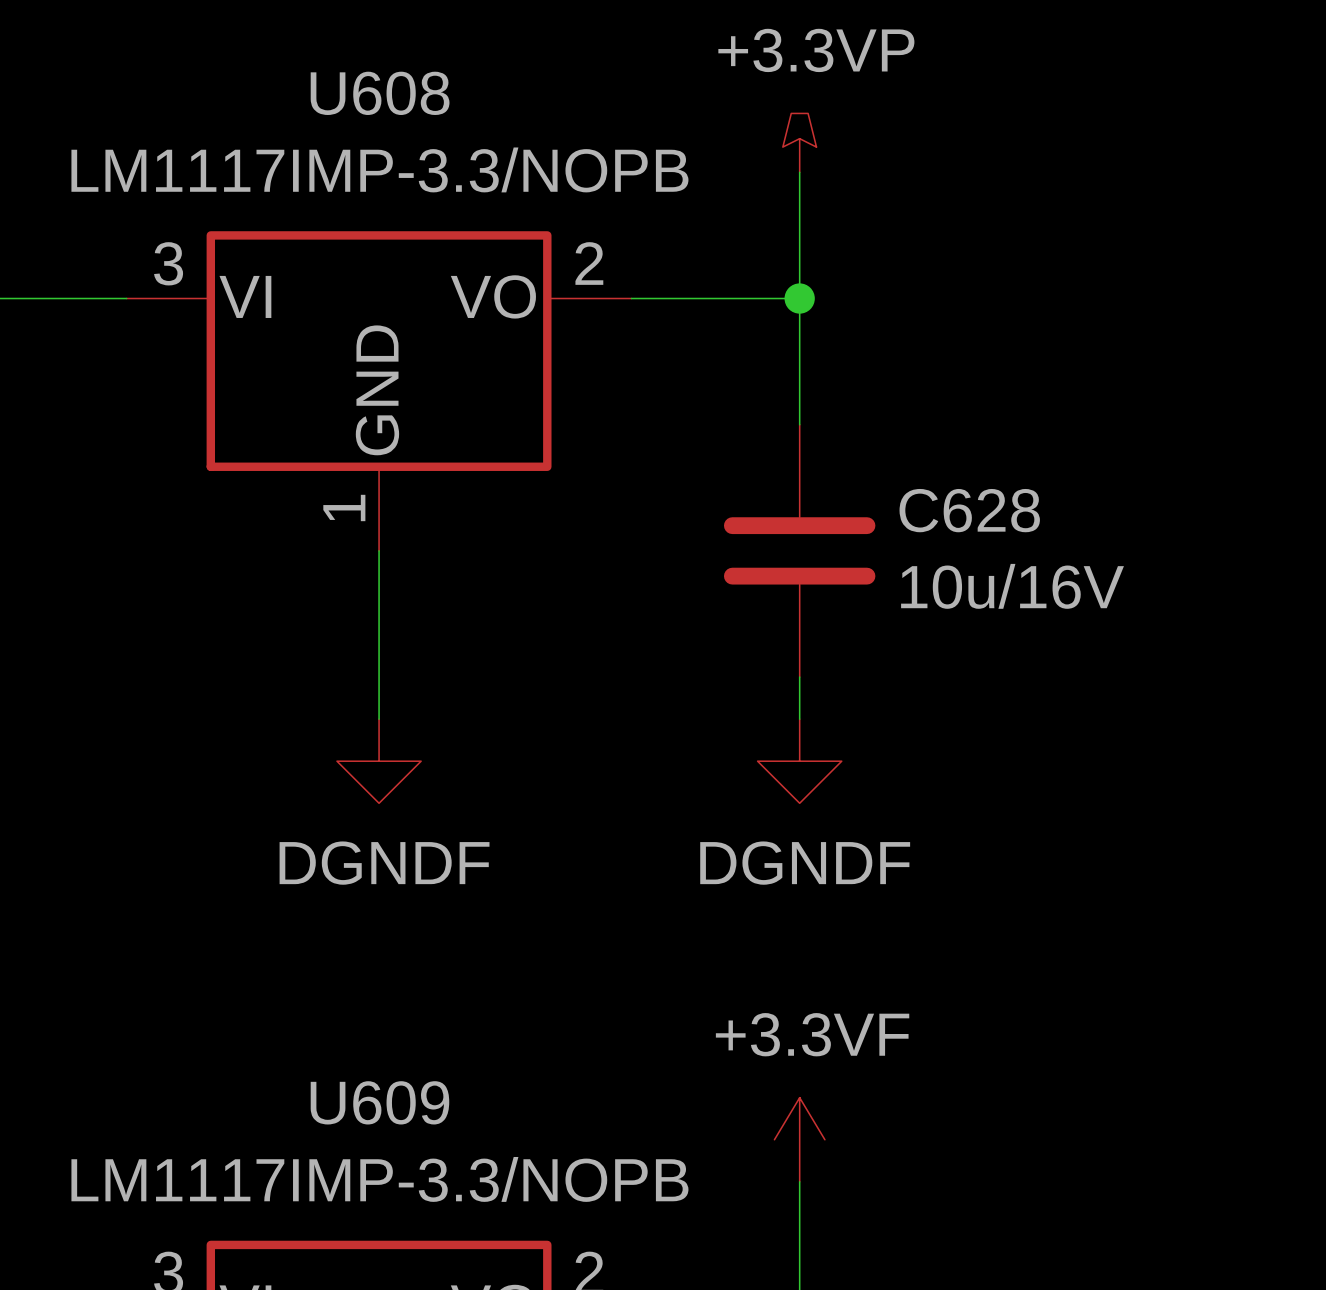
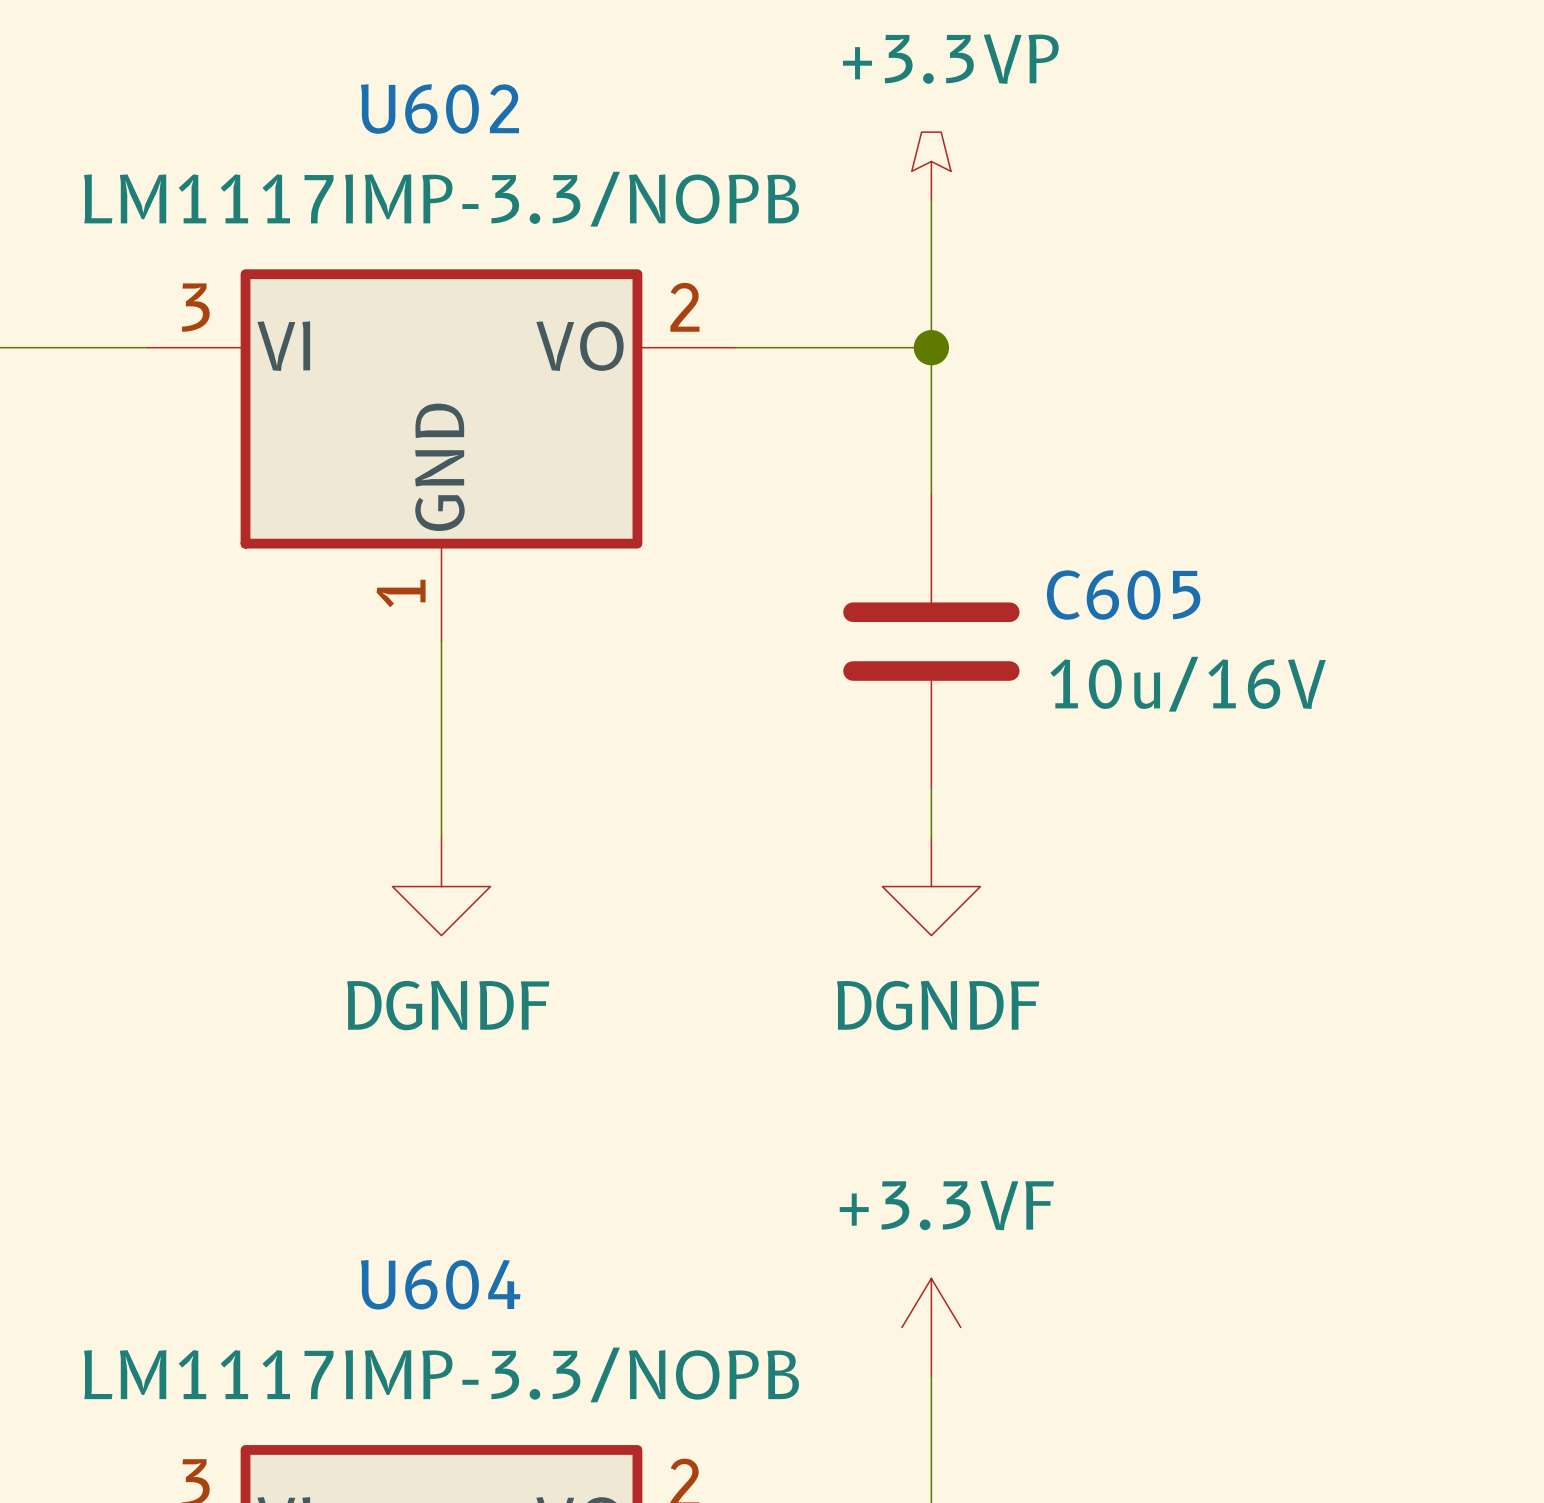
U608 name: U608 (380, 93) -> U602 (439, 109)
C628 name: C628 (969, 510) -> C605 (1123, 595)
U609 name: U609 (379, 1102) -> U604 (440, 1284)

